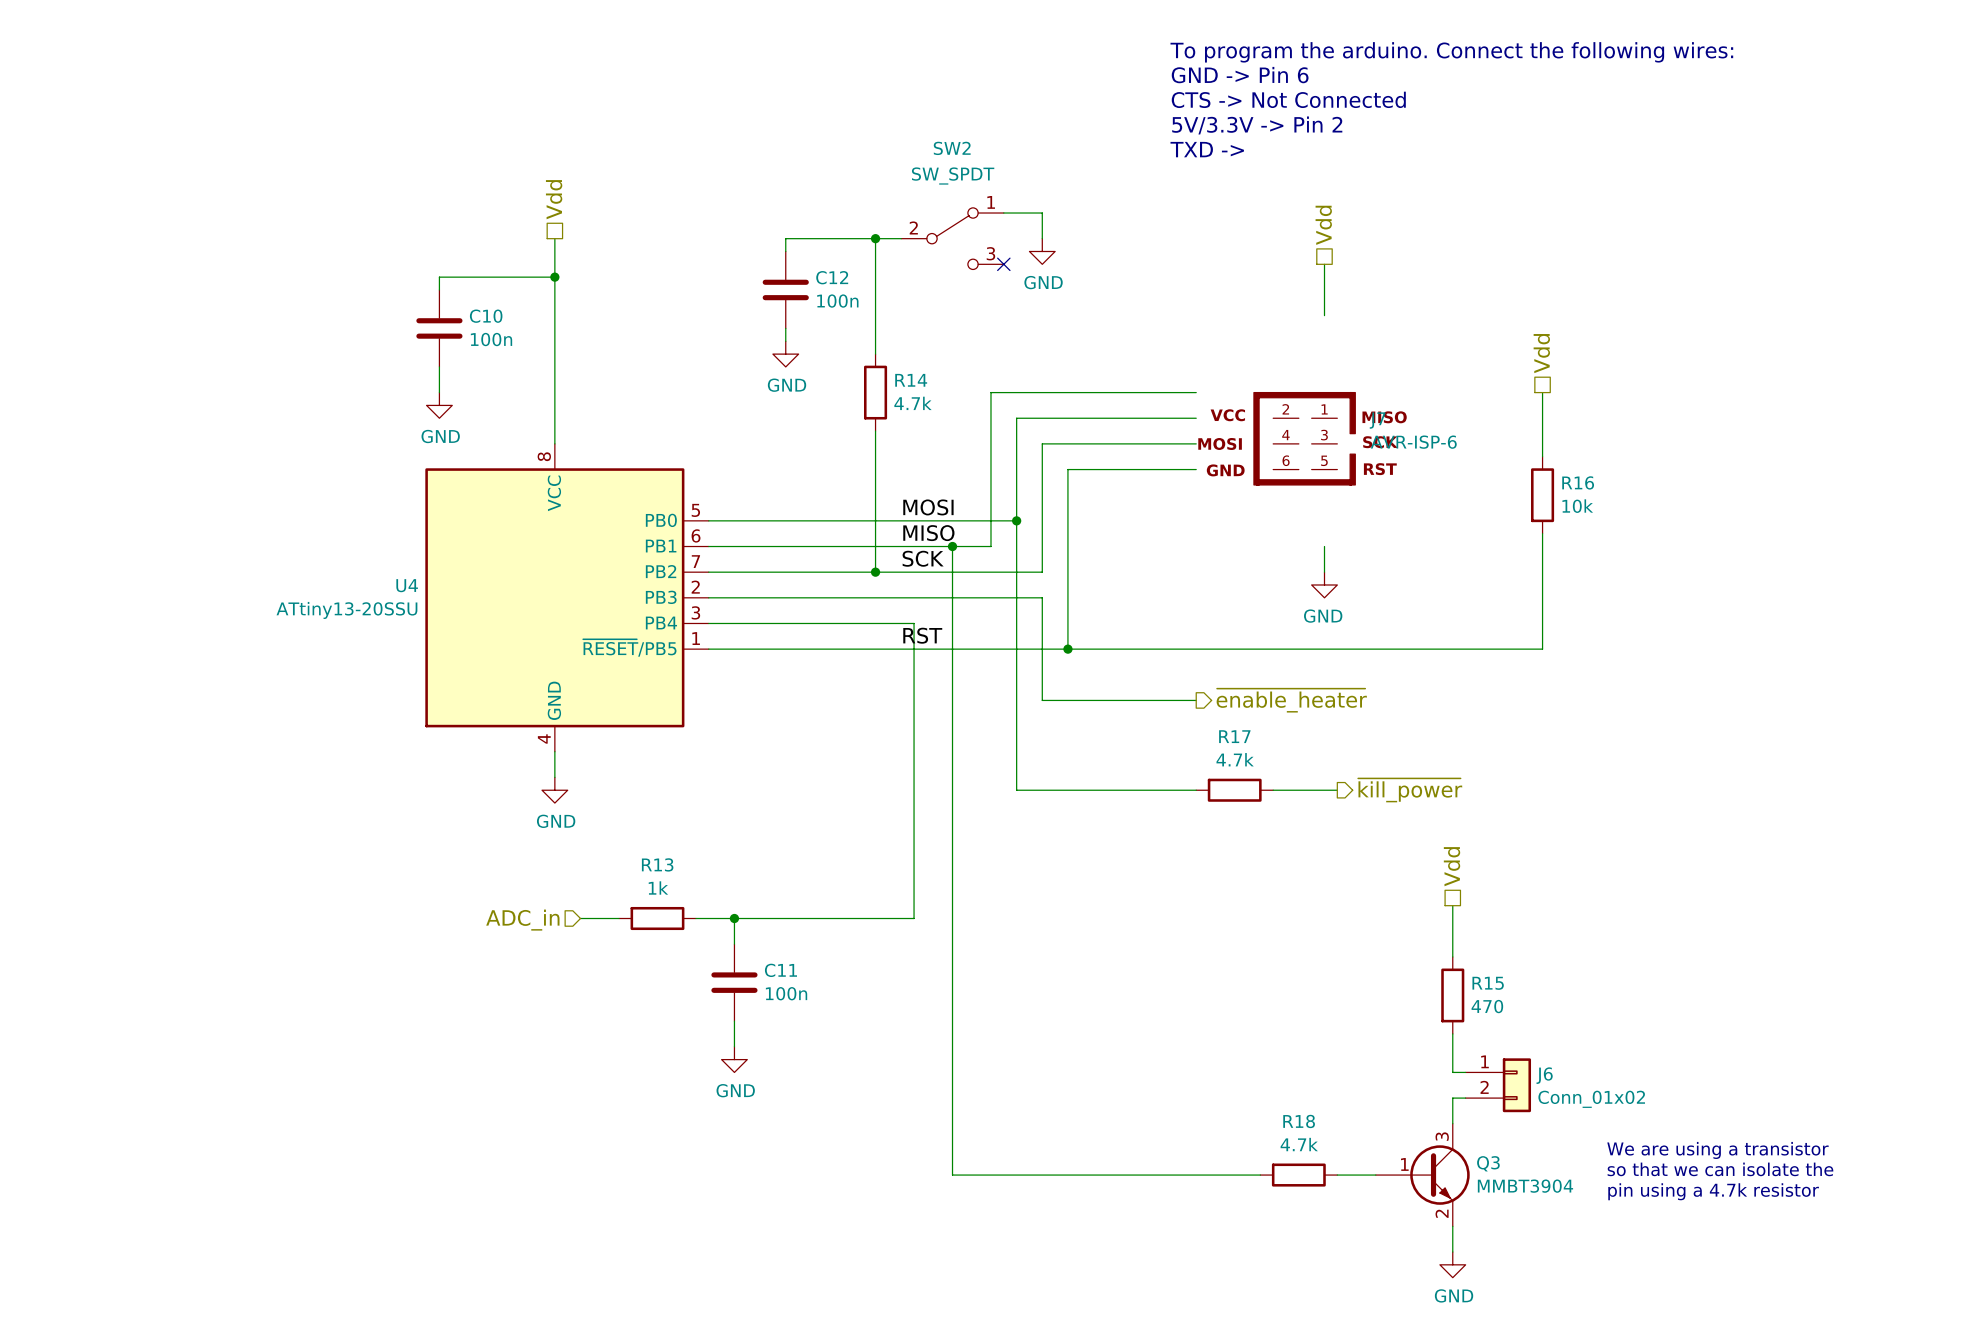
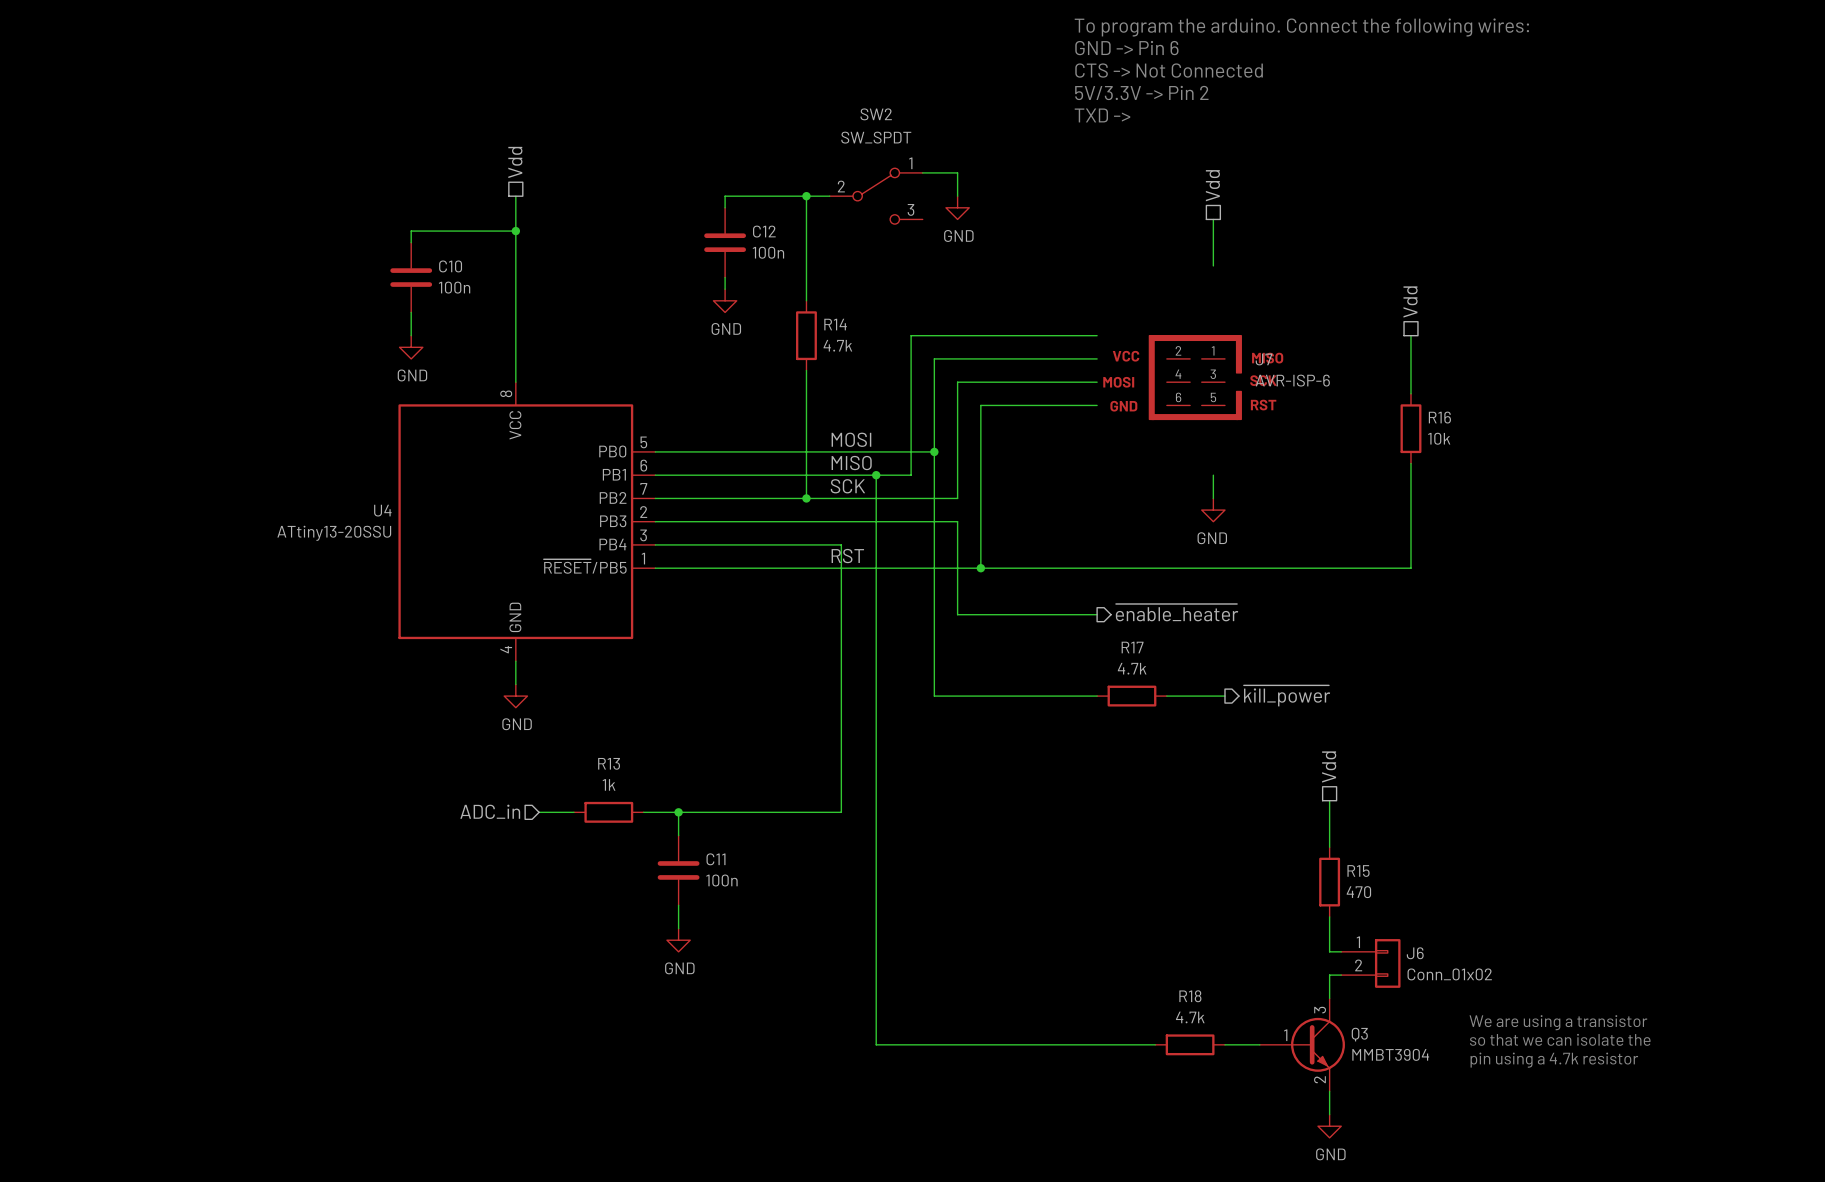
no-connect mark: (1003, 264) -> none

